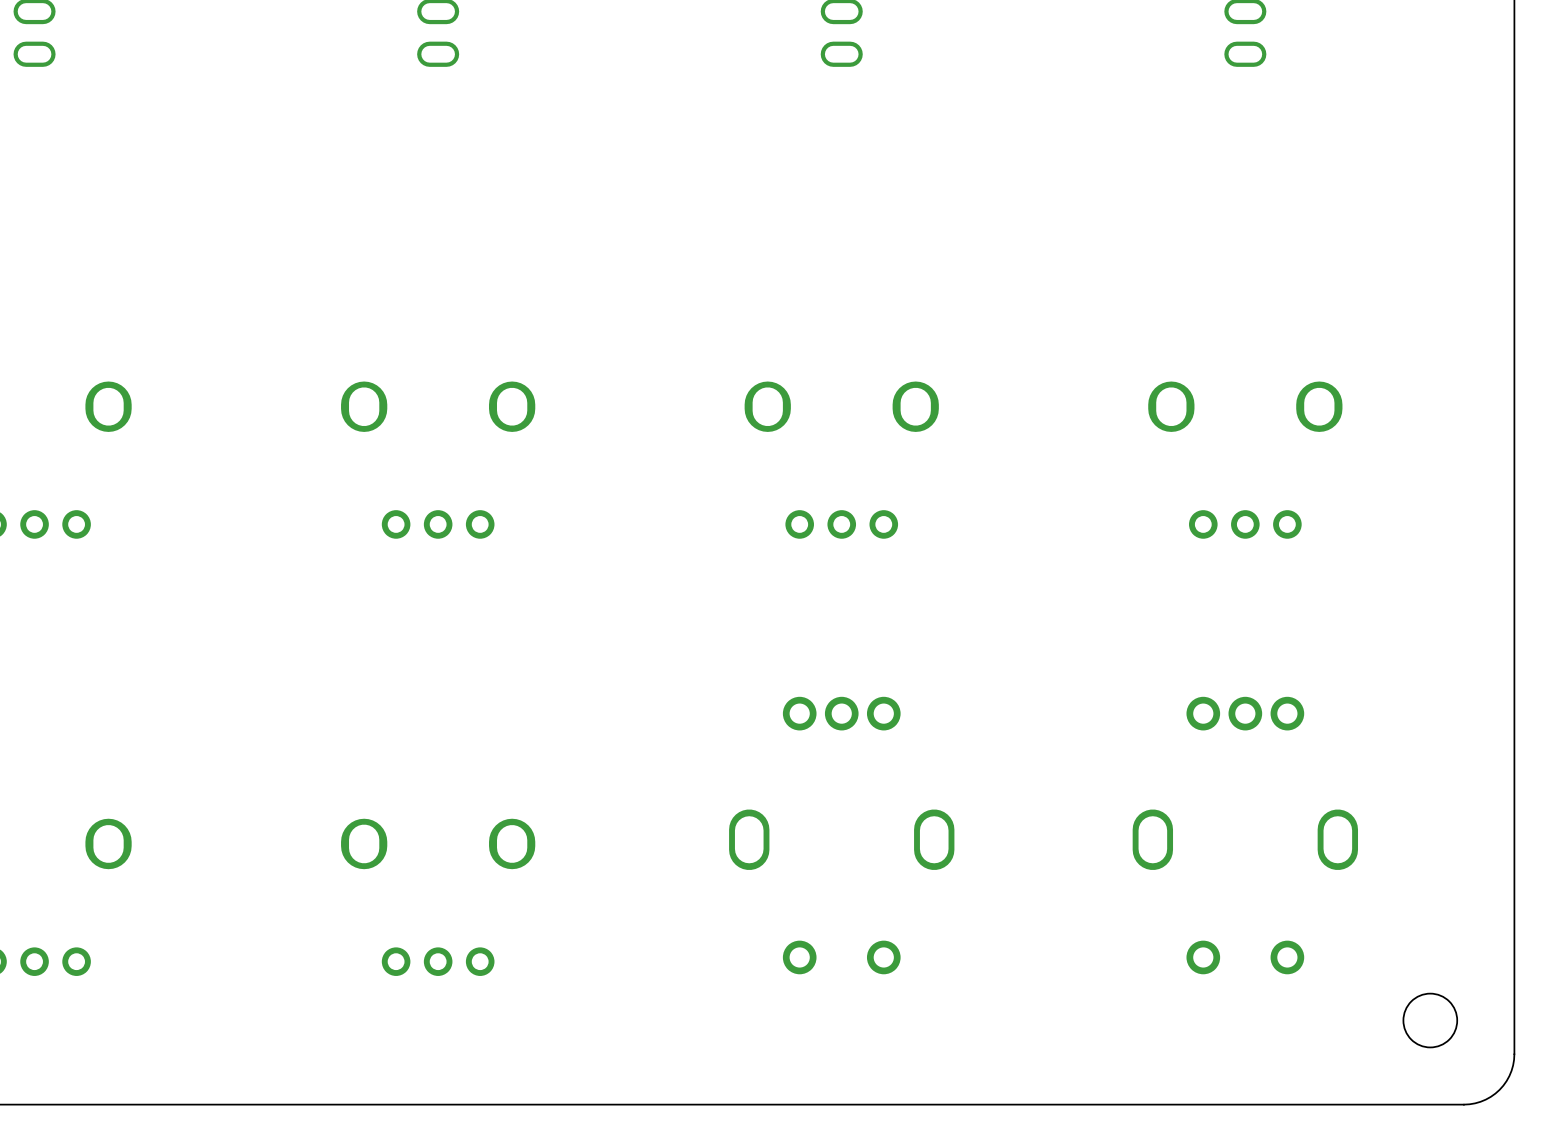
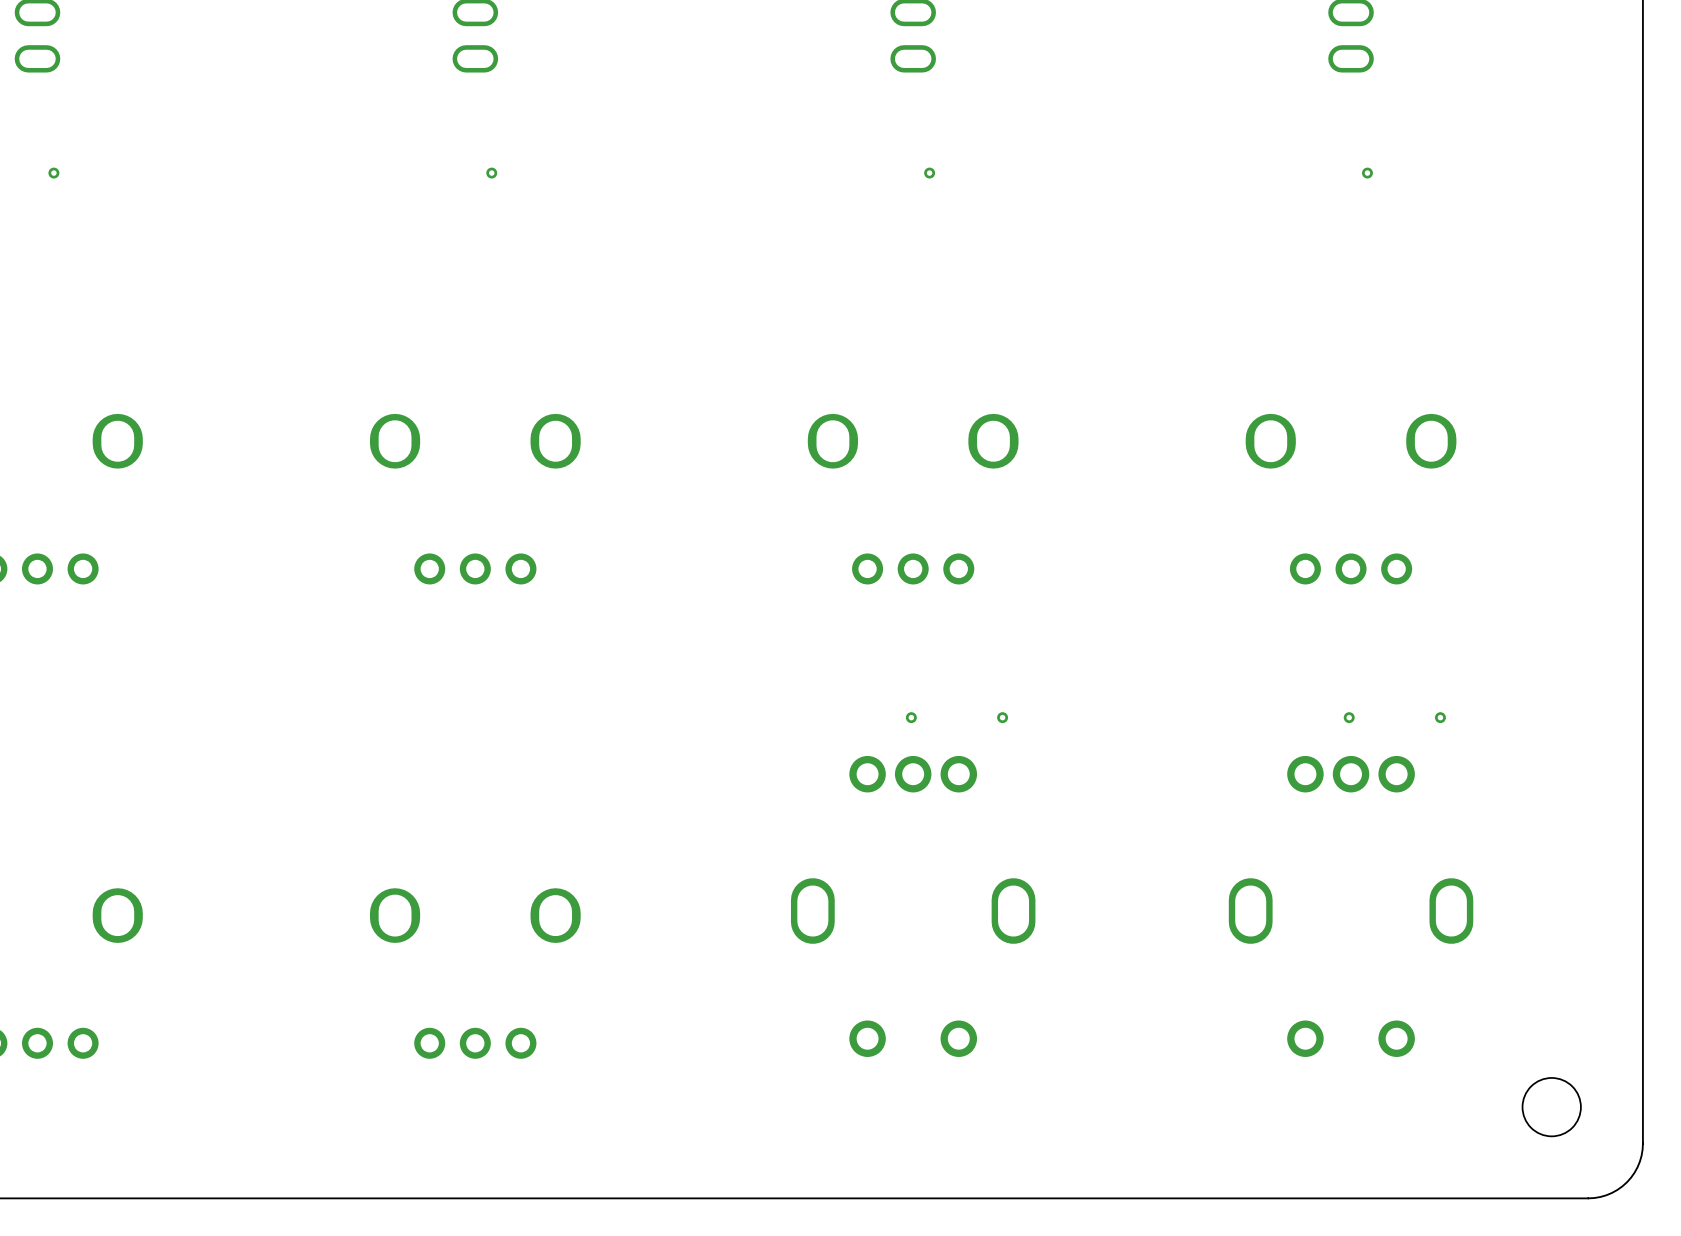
via: none -> (53, 173)
via: none -> (491, 173)
via: none -> (929, 173)
via: none -> (1367, 173)
via: none -> (911, 717)
via: none -> (1002, 717)
via: none -> (1349, 717)
via: none -> (1440, 717)

